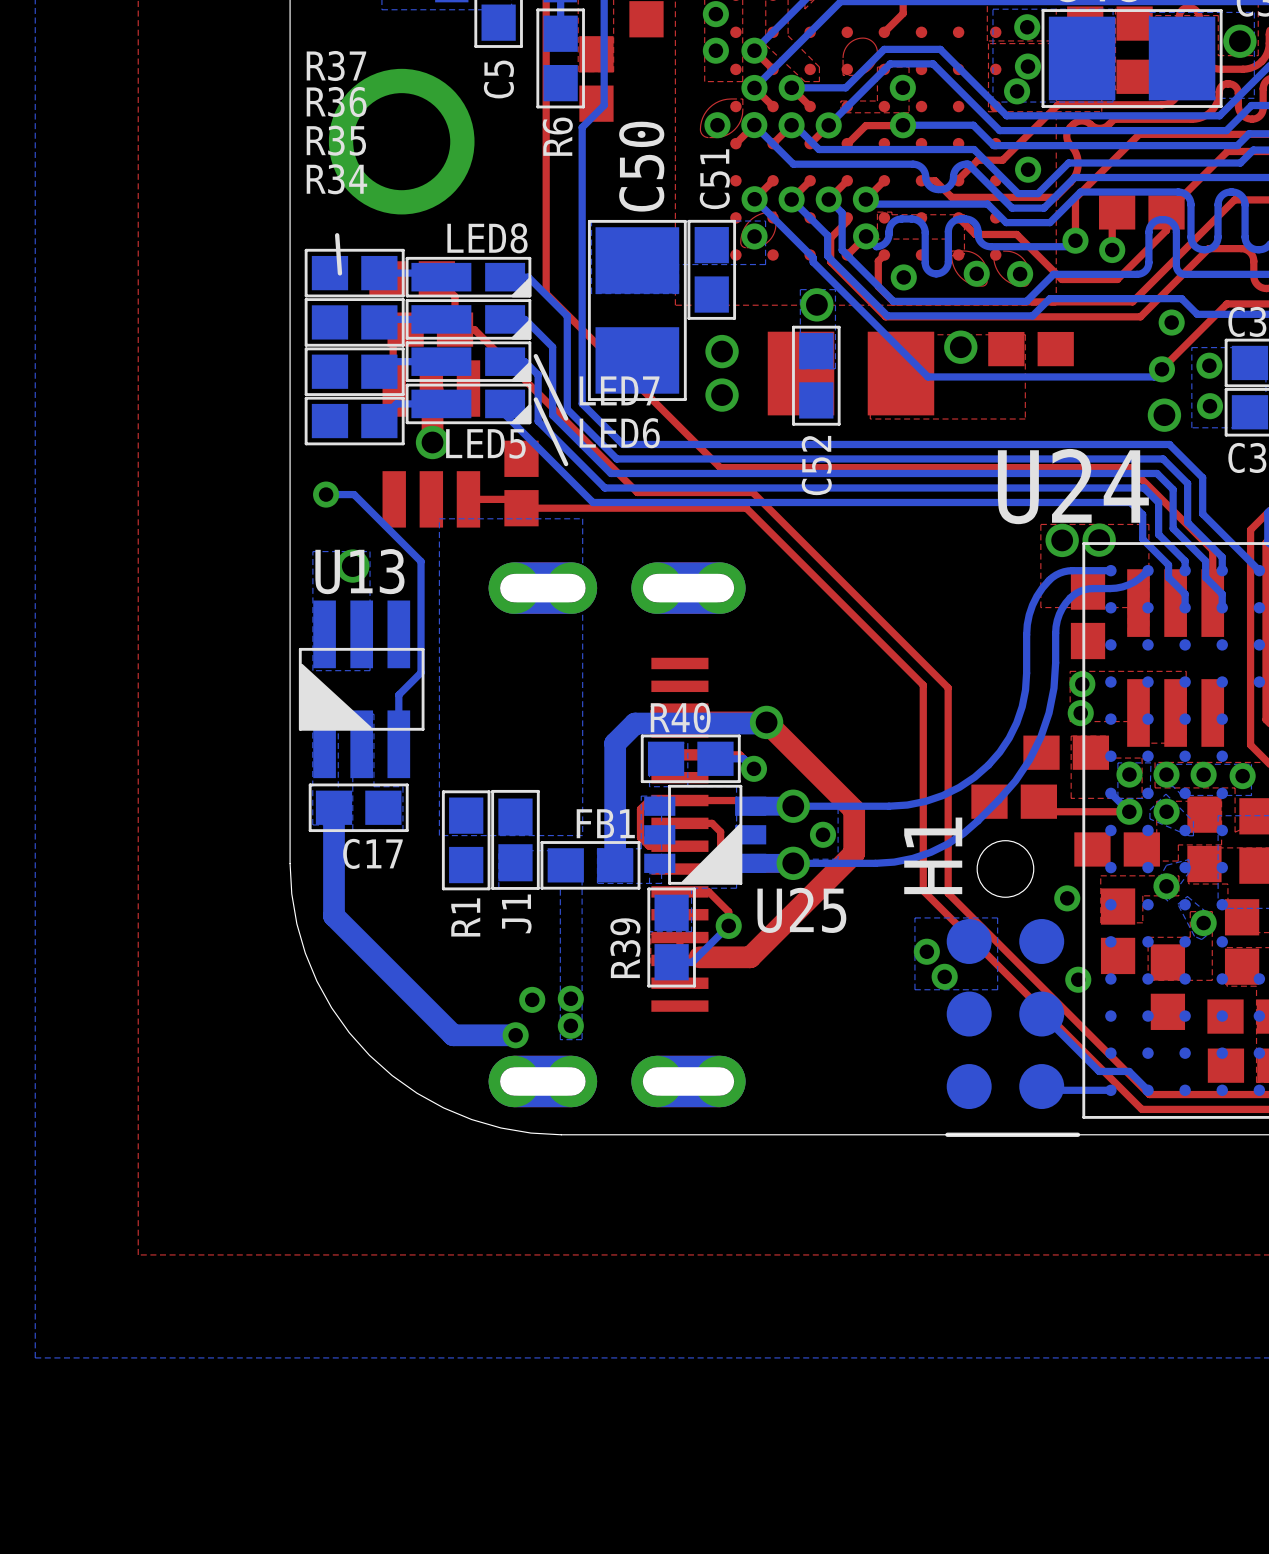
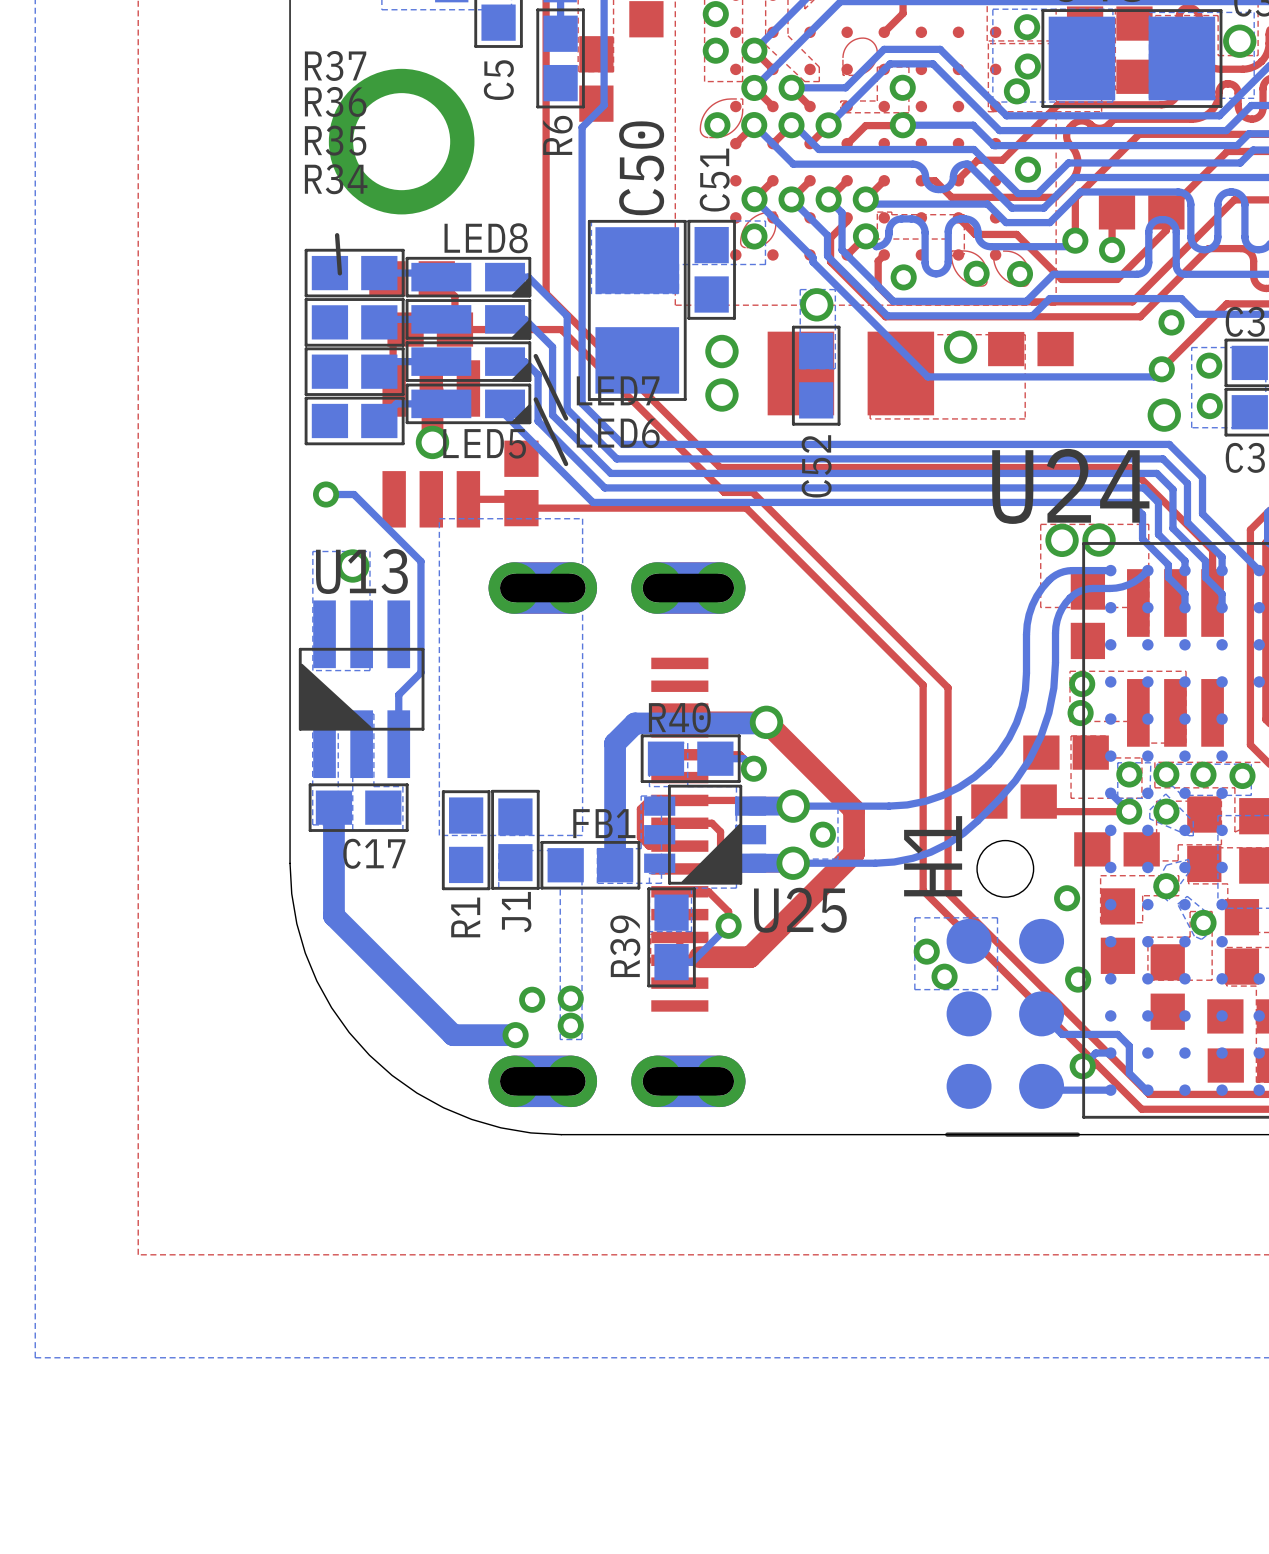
top track: (474, 329) (637, 492) (724, 492) -> (474, 329) (561, 329) (724, 492)
bottom track: (1062, 1034) (1099, 1071) (1129, 1071) (1148, 1090) -> (1062, 1034) (1117, 1034) (1129, 1046) (1129, 1073) (1147, 1090)
bottom track: none -> (1110, 1053) (1095, 1053) (1082, 1066)
via: none -> (1082, 1066)

